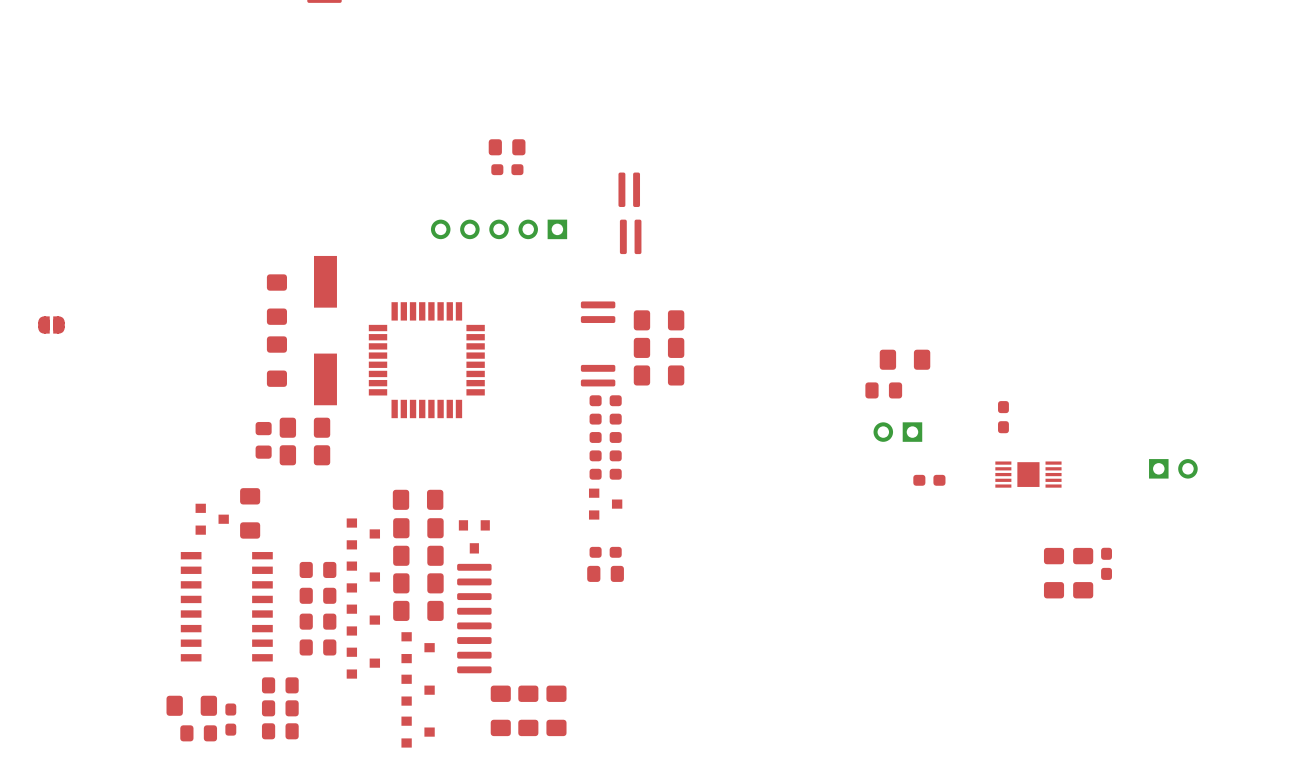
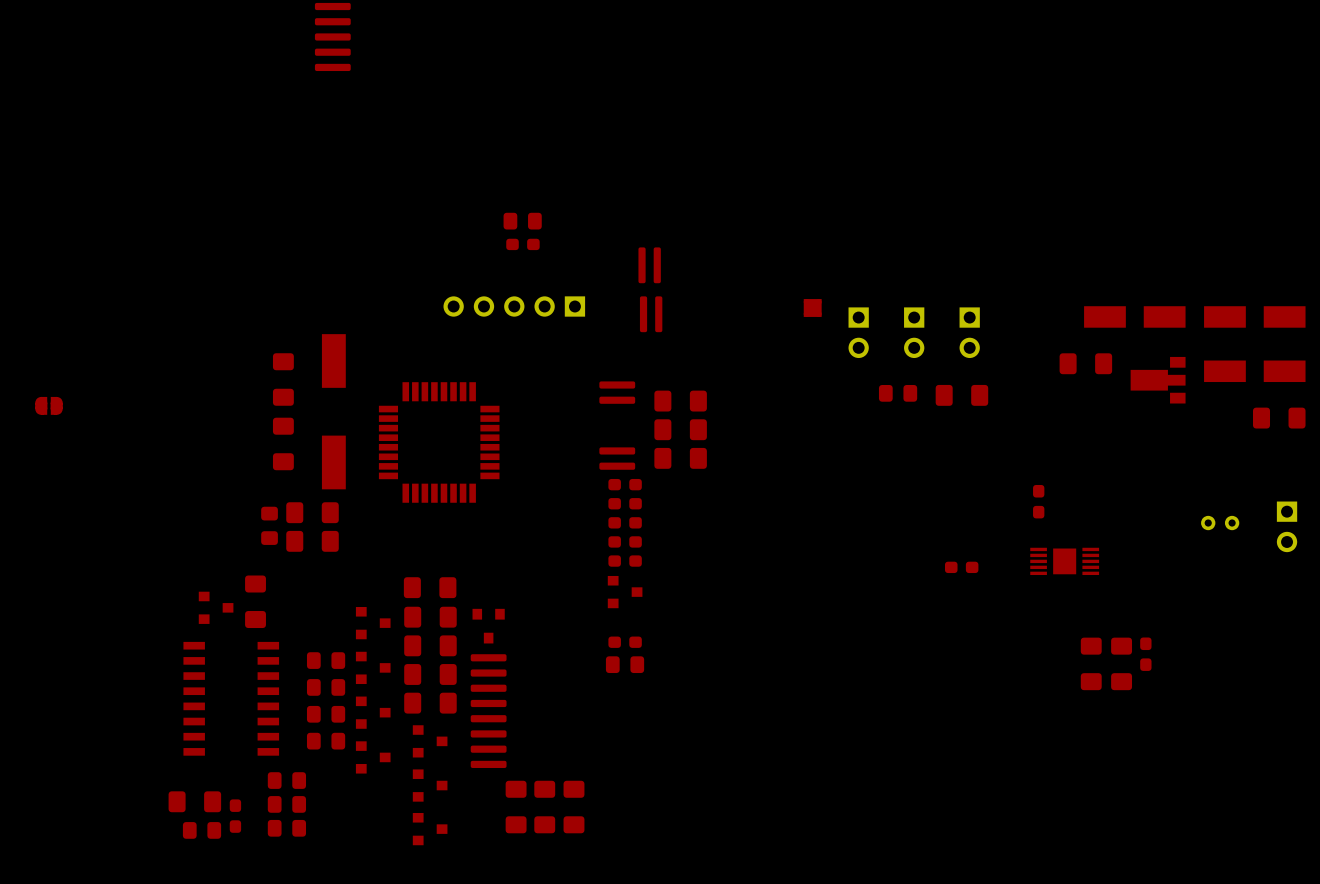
part: none -> (812, 307)
part: none -> (1134, 316)
part: none -> (1254, 316)
part: none -> (858, 332)
part: none -> (914, 332)
part: none -> (969, 332)
part: none -> (1085, 363)
part: none -> (1254, 371)
part: none -> (1158, 380)
part: none -> (1279, 418)
part position: (904, 359) -> (961, 395)
part position: (883, 390) -> (898, 393)
part: (897, 432) -> none
part: none -> (1220, 523)
part rotation: 0° (1173, 468) -> 90° clockwise (1287, 526)
part position: (1173, 468) -> (1287, 526)

